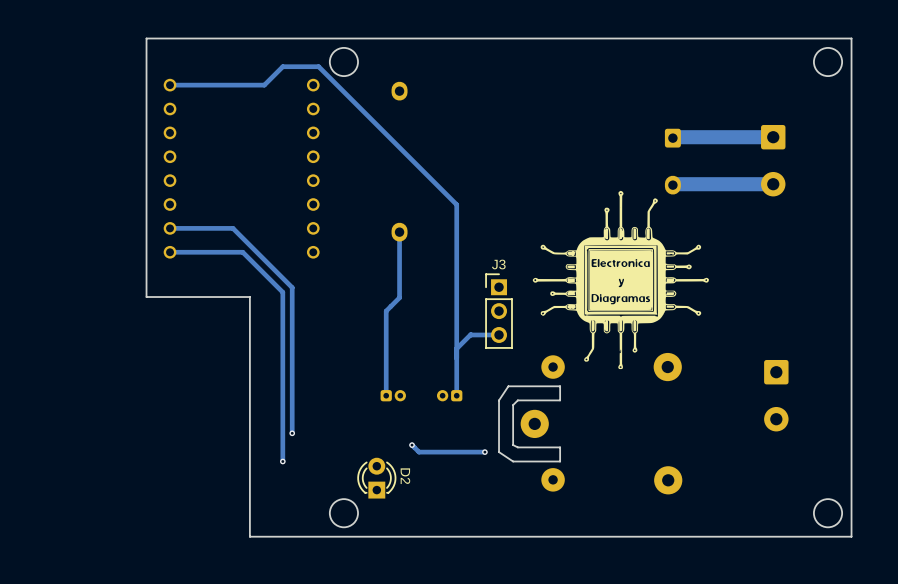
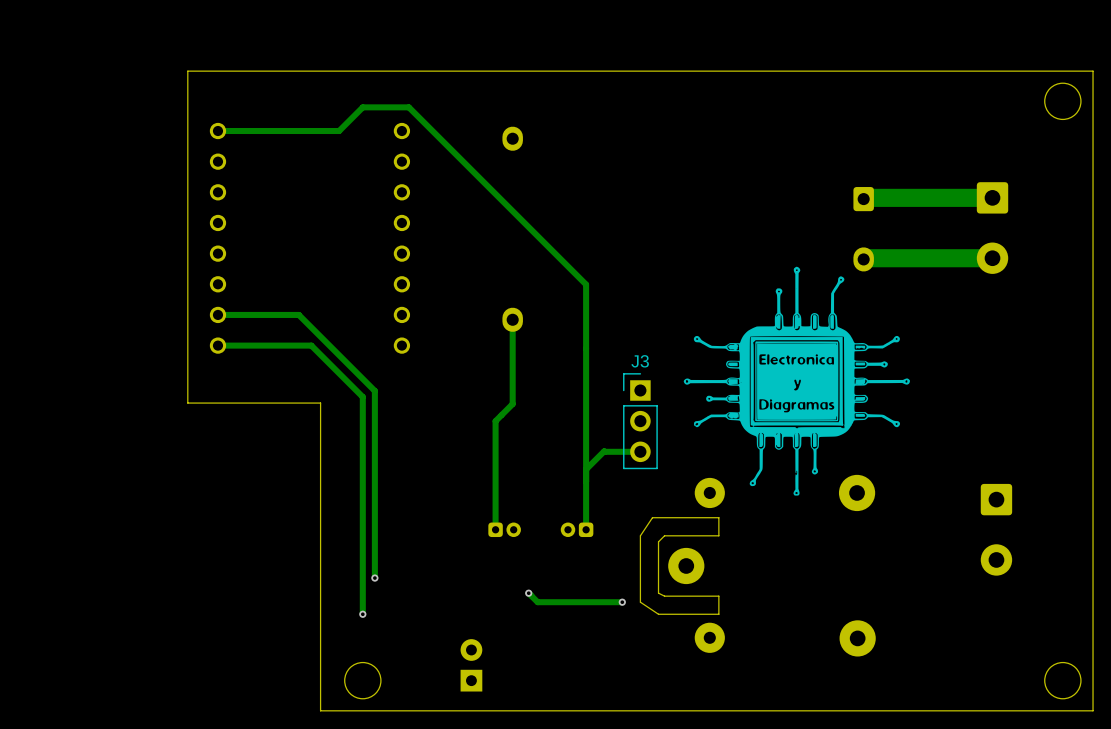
round board edge: [329, 47, 359, 77] -> none
D2 side: bottom (376, 478) -> top (471, 665)
round board edge position: (343, 513) -> (362, 680)

